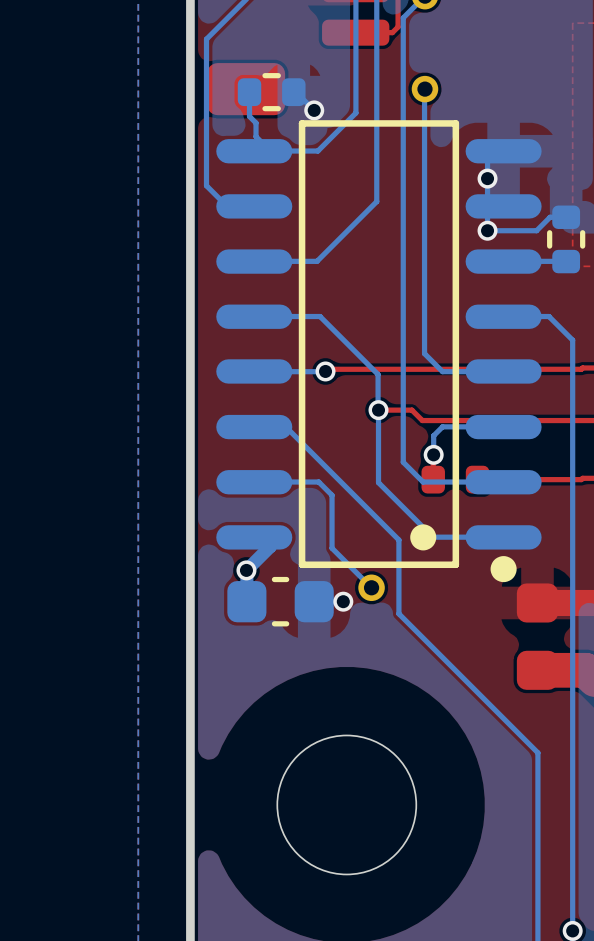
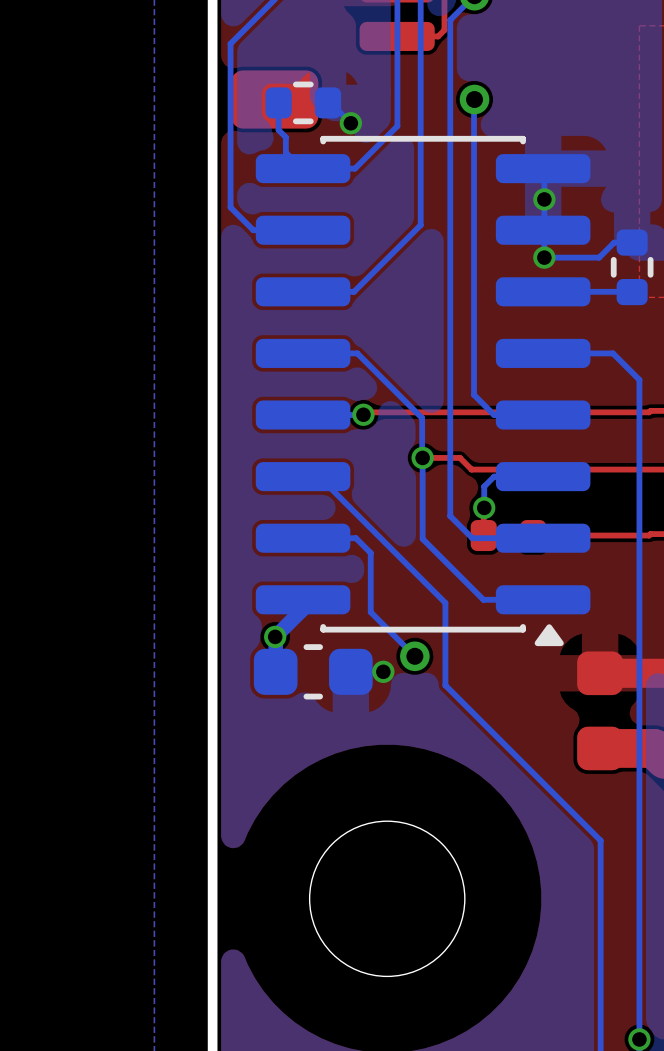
part footprint: [216, 120, 542, 583] -> [255, 135, 591, 647]

